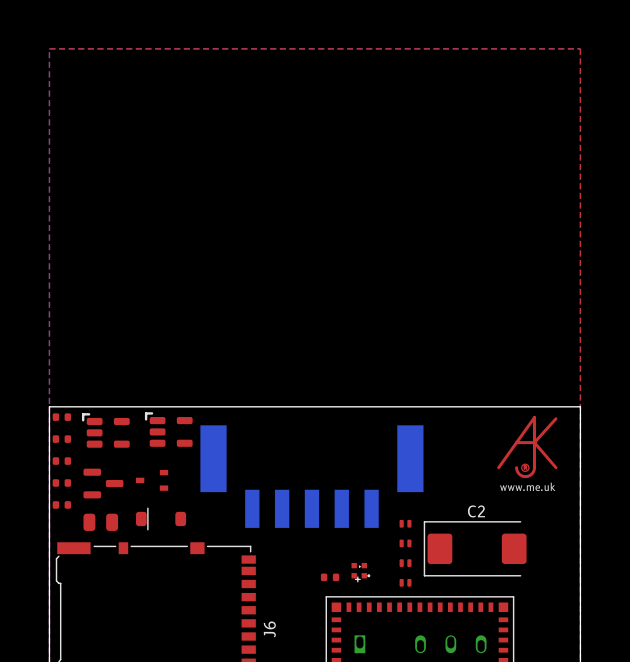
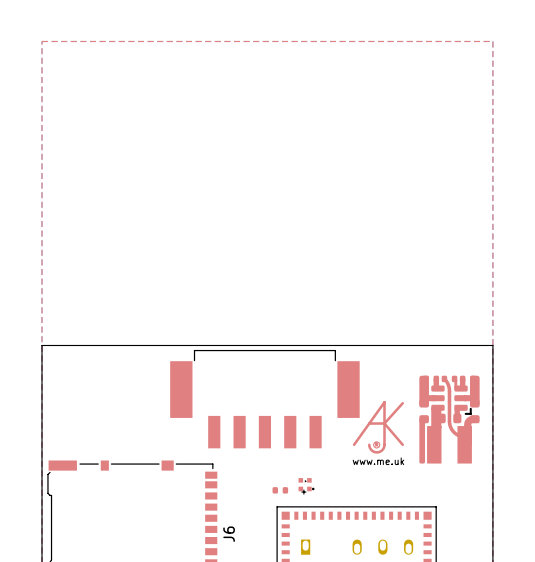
part: (61, 417) -> none
part: (168, 429) -> none
part: (105, 430) -> none
part: (61, 439) -> none
drawing position: (527, 447) -> (378, 427)
part: (61, 461) -> none
part side: bottom (311, 476) -> top (264, 399)
part: (152, 480) -> none
part: (61, 483) -> none
part: (103, 483) -> none
part: none -> (449, 419)
part: (61, 504) -> none
part: (161, 518) -> none
part: (100, 522) -> none
part: (405, 523) -> none
part: (405, 543) -> none
C2: (475, 548) -> none
part: (405, 563) -> none
part: (405, 582) -> none

